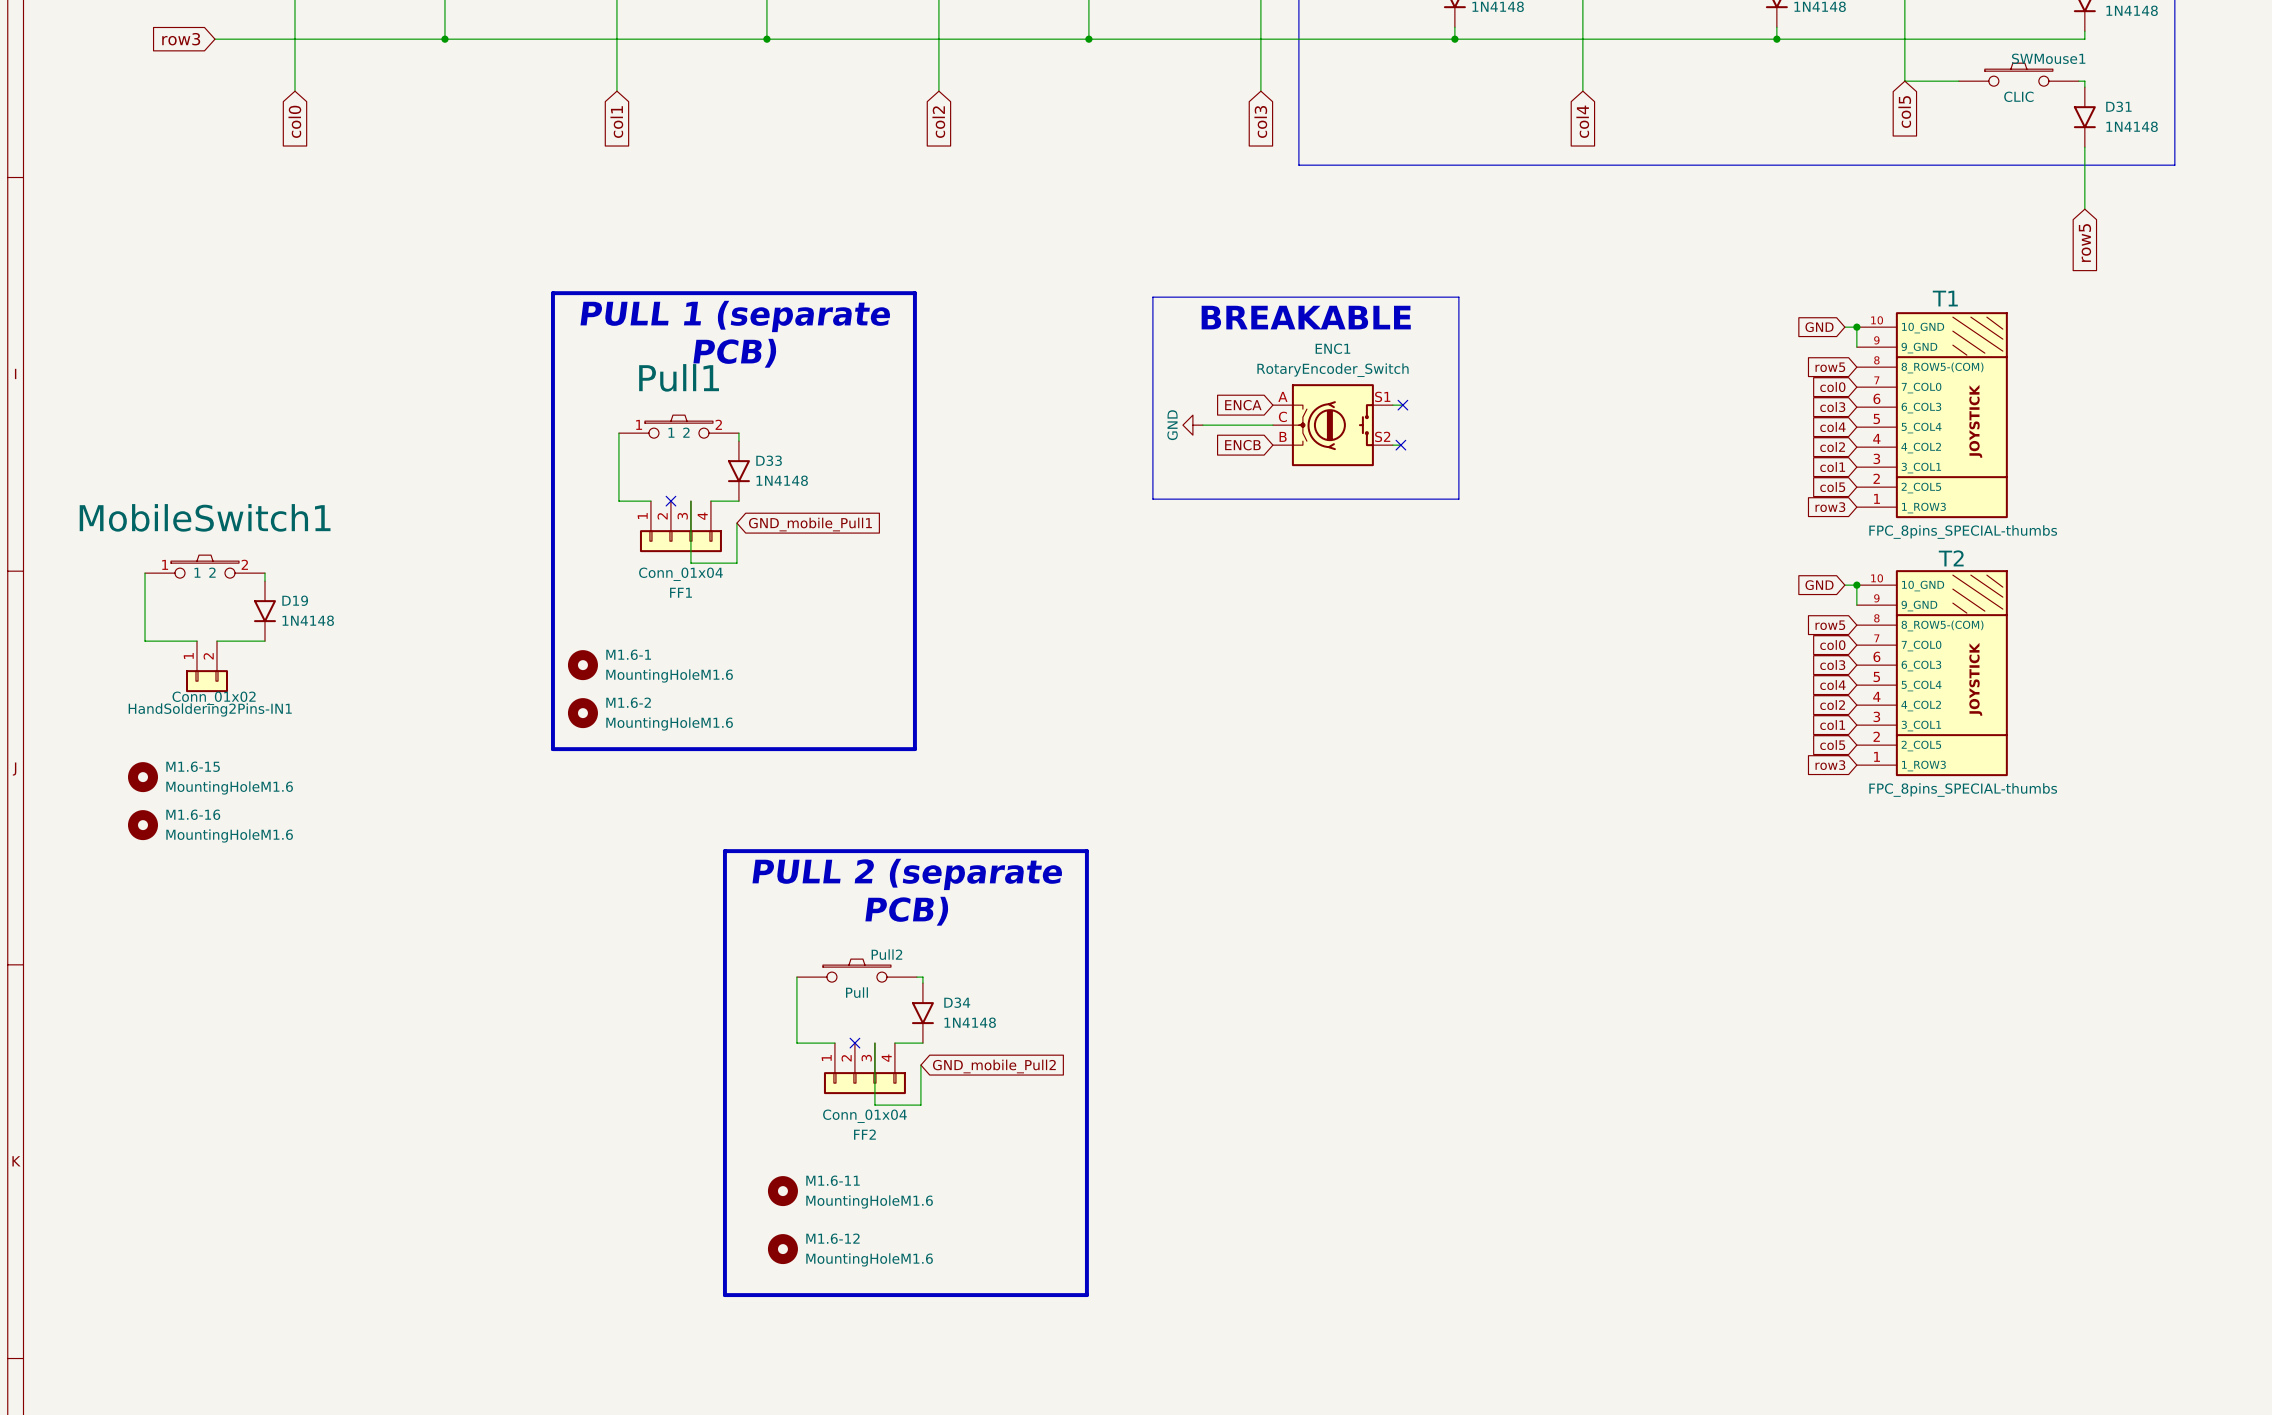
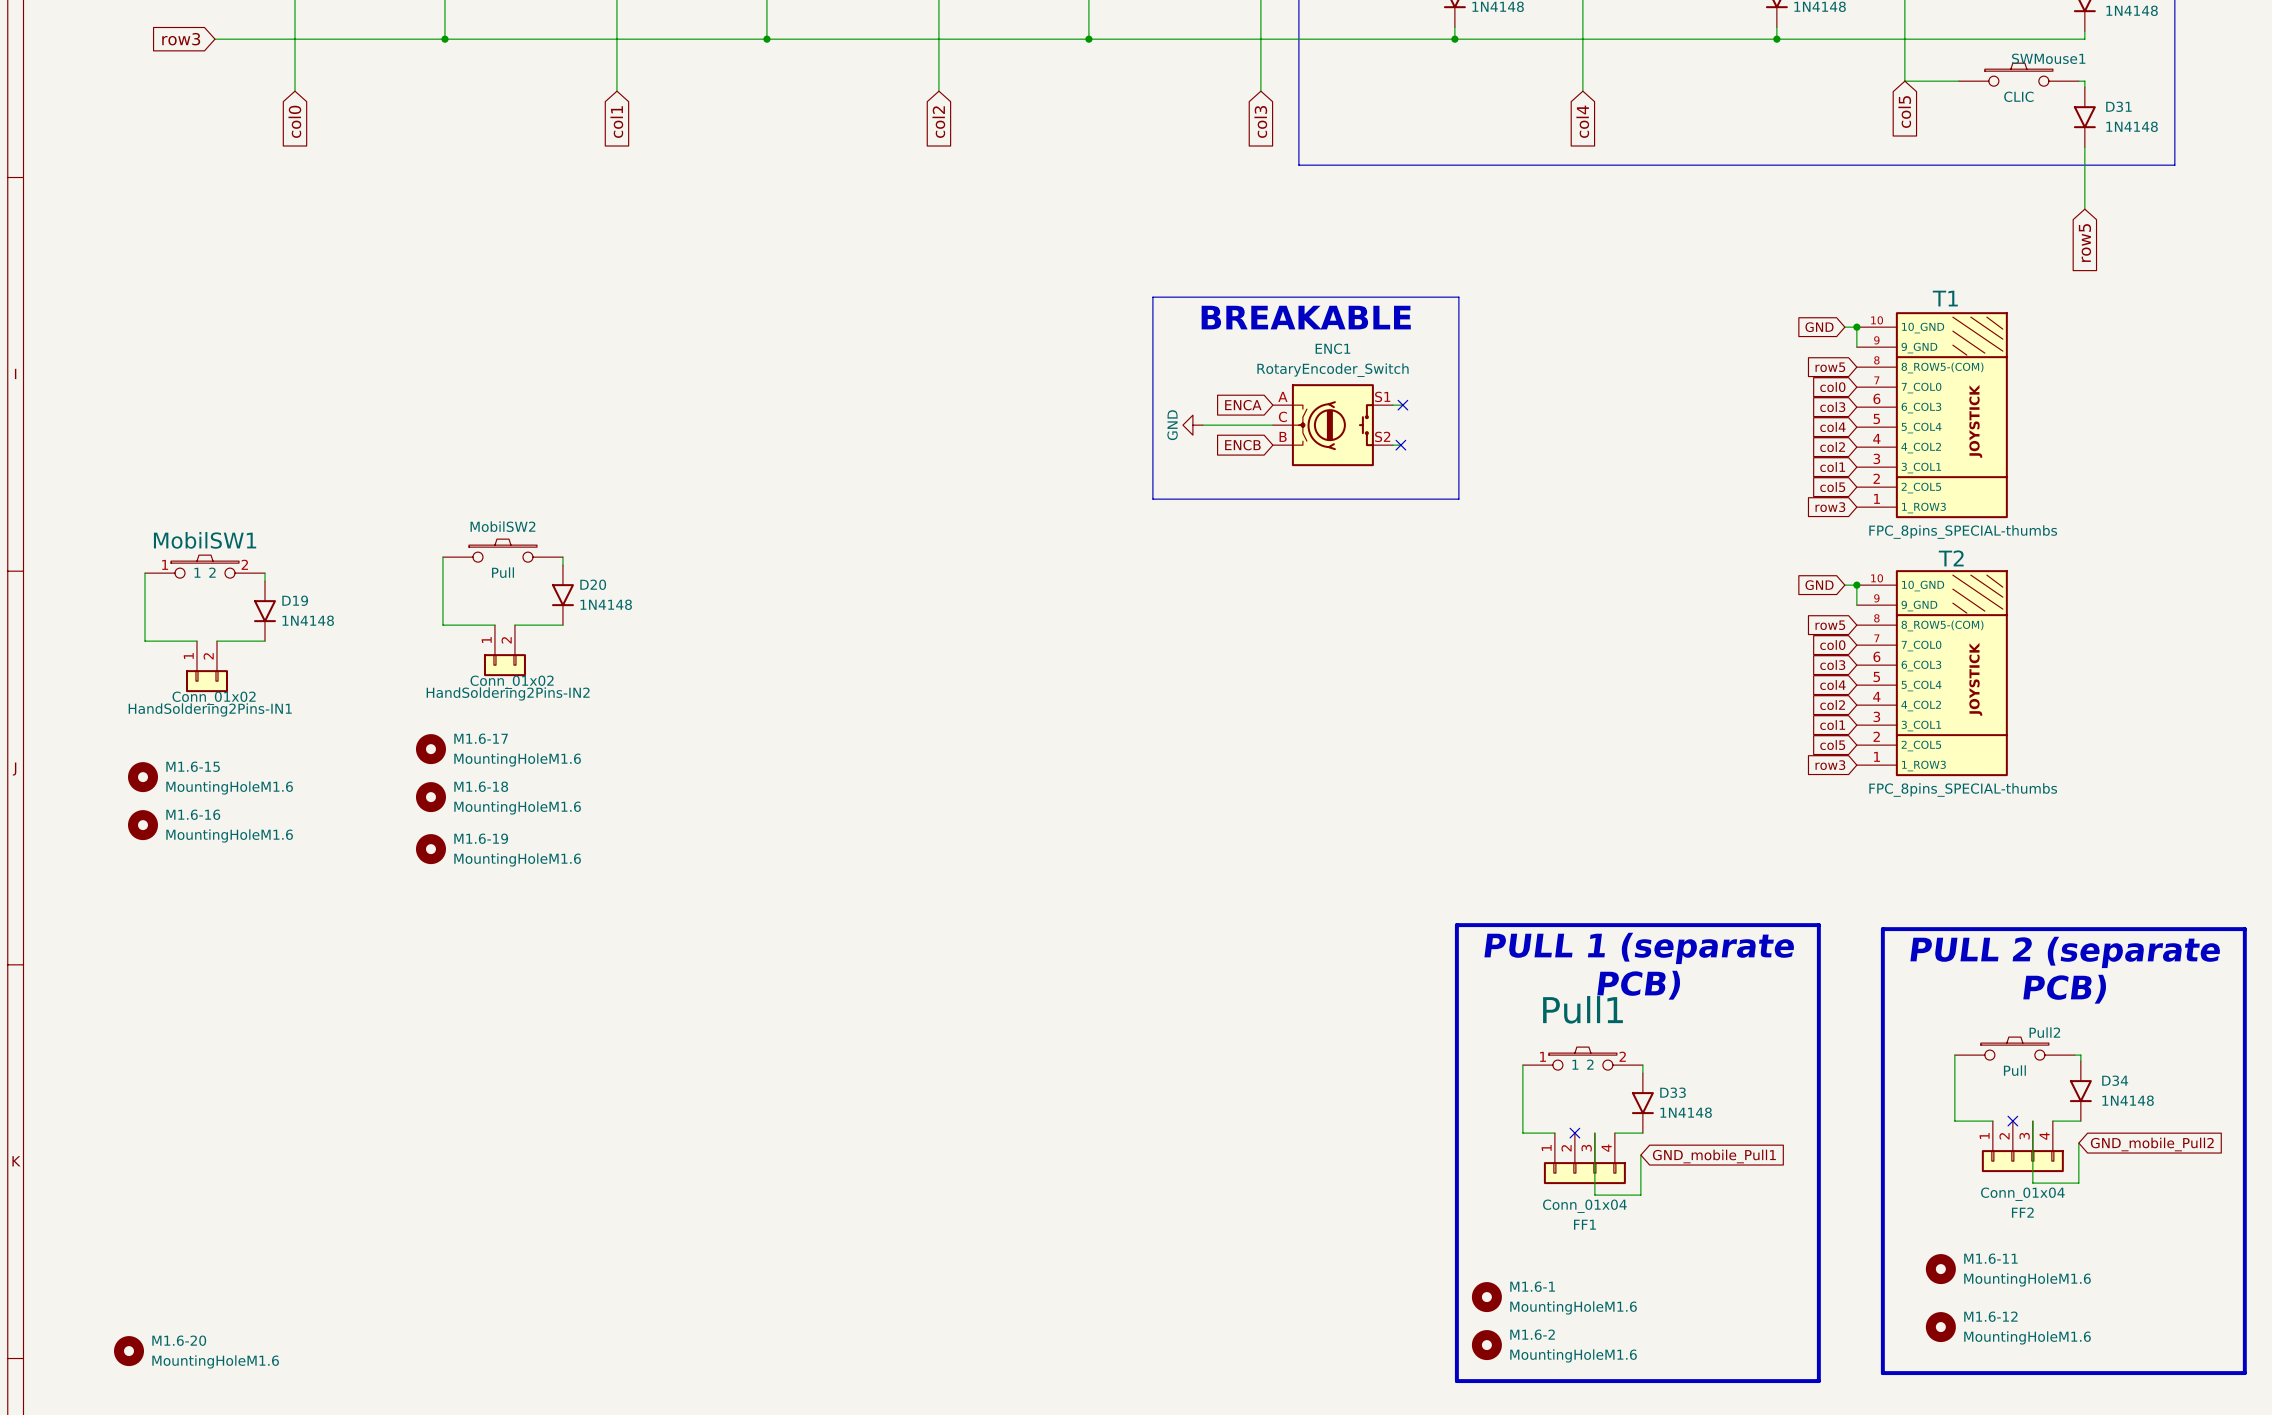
line: (552, 293) (914, 293) (914, 749) (552, 749) (552, 293) -> none
text: PULL 1 (separate (735, 316) -> none
text: PCB) (734, 353) -> none
Pull1 position: (678, 426) -> (1582, 1058)
wire: (618, 433) (618, 501) (650, 501) -> none
wire: (738, 433) (738, 441) -> none
D33 position: (738, 471) -> (1642, 1103)
no-connect mark: (670, 501) -> none
wire: (690, 501) (690, 563) (736, 563) (736, 523) -> none
wire: (710, 501) (738, 501) -> none
MobileSwitch1 name: MobileSwitch1 (205, 517) -> MobilSW1 (205, 540)
global label: GND_mobile_Pull1 (810, 524) -> none
FF1 position: (680, 526) -> (1584, 1158)
MobilSW2: none -> Pull (502, 550)
wire: none -> (442, 557) (442, 625) (494, 625)
wire: none -> (562, 557) (562, 565)
D20: none -> 1N4148 (562, 595)
wire: none -> (514, 625) (562, 625)
HandSoldering2Pins-IN2: none -> Conn_01x02 (504, 650)
M1.6-1 position: (582, 665) -> (1486, 1297)
M1.6-2 position: (582, 713) -> (1486, 1345)
M1.6-17: none -> MountingHoleM1.6 (430, 749)
M1.6-18: none -> MountingHoleM1.6 (430, 797)
M1.6-19: none -> MountingHoleM1.6 (430, 849)
line: (724, 851) (1086, 851) (1086, 1295) (724, 1295) (724, 851) -> none
text: PULL 2 (separate (907, 874) -> none
text: PCB) (906, 911) -> none
line: none -> (1456, 925) (1818, 925) (1818, 1381) (1456, 1381) (1456, 925)
line: none -> (1882, 929) (2244, 929) (2244, 1373) (1882, 1373) (1882, 929)
text: none -> PULL 1 (separate (1639, 948)
text: none -> PULL 2 (separate (2065, 952)
Pull2 position: (856, 970) -> (2014, 1048)
wire: (796, 977) (796, 1043) (834, 1043) -> none
wire: (916, 977) (922, 977) (922, 983) -> none
text: none -> PCB) (1638, 985)
text: none -> PCB) (2064, 989)
D34 position: (922, 1013) -> (2080, 1091)
no-connect mark: (854, 1043) -> none
wire: (874, 1043) (874, 1105) (920, 1105) (920, 1065) -> none
wire: (894, 1043) (922, 1043) -> none
wire: none -> (1954, 1055) (1954, 1121) (1992, 1121)
wire: none -> (2074, 1055) (2080, 1055) (2080, 1061)
wire: none -> (1522, 1065) (1522, 1133) (1554, 1133)
wire: none -> (1642, 1065) (1642, 1073)
global label: GND_mobile_Pull2 (994, 1066) -> none
FF2 position: (864, 1068) -> (2022, 1146)
no-connect mark: none -> (2012, 1121)
wire: none -> (2032, 1121) (2032, 1183) (2078, 1183) (2078, 1143)
wire: none -> (2052, 1121) (2080, 1121)
no-connect mark: none -> (1574, 1133)
wire: none -> (1594, 1133) (1594, 1195) (1640, 1195) (1640, 1155)
wire: none -> (1614, 1133) (1642, 1133)
global label: none -> GND_mobile_Pull2 (2152, 1144)
global label: none -> GND_mobile_Pull1 (1714, 1156)
M1.6-11 position: (782, 1191) -> (1940, 1269)
M1.6-12 position: (782, 1249) -> (1940, 1327)
M1.6-20: none -> MountingHoleM1.6 (129, 1351)

